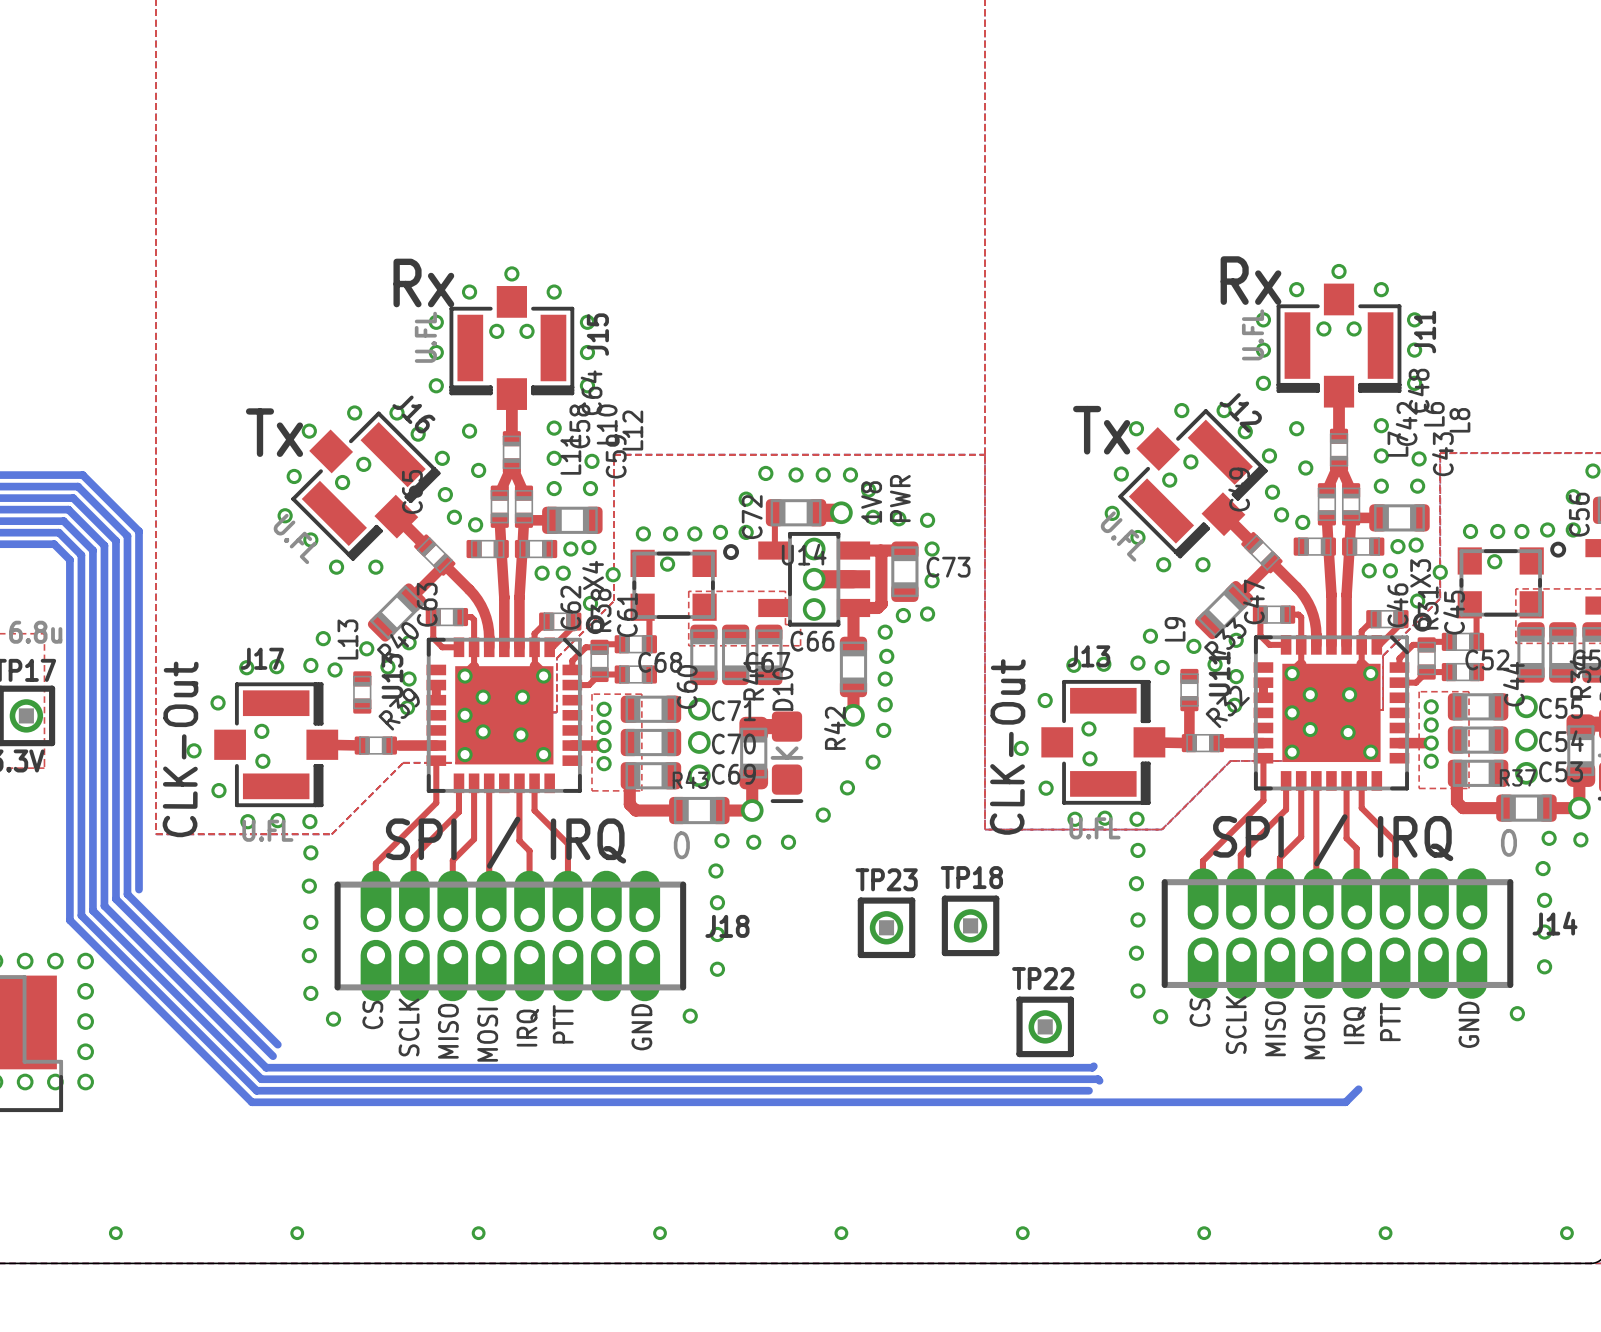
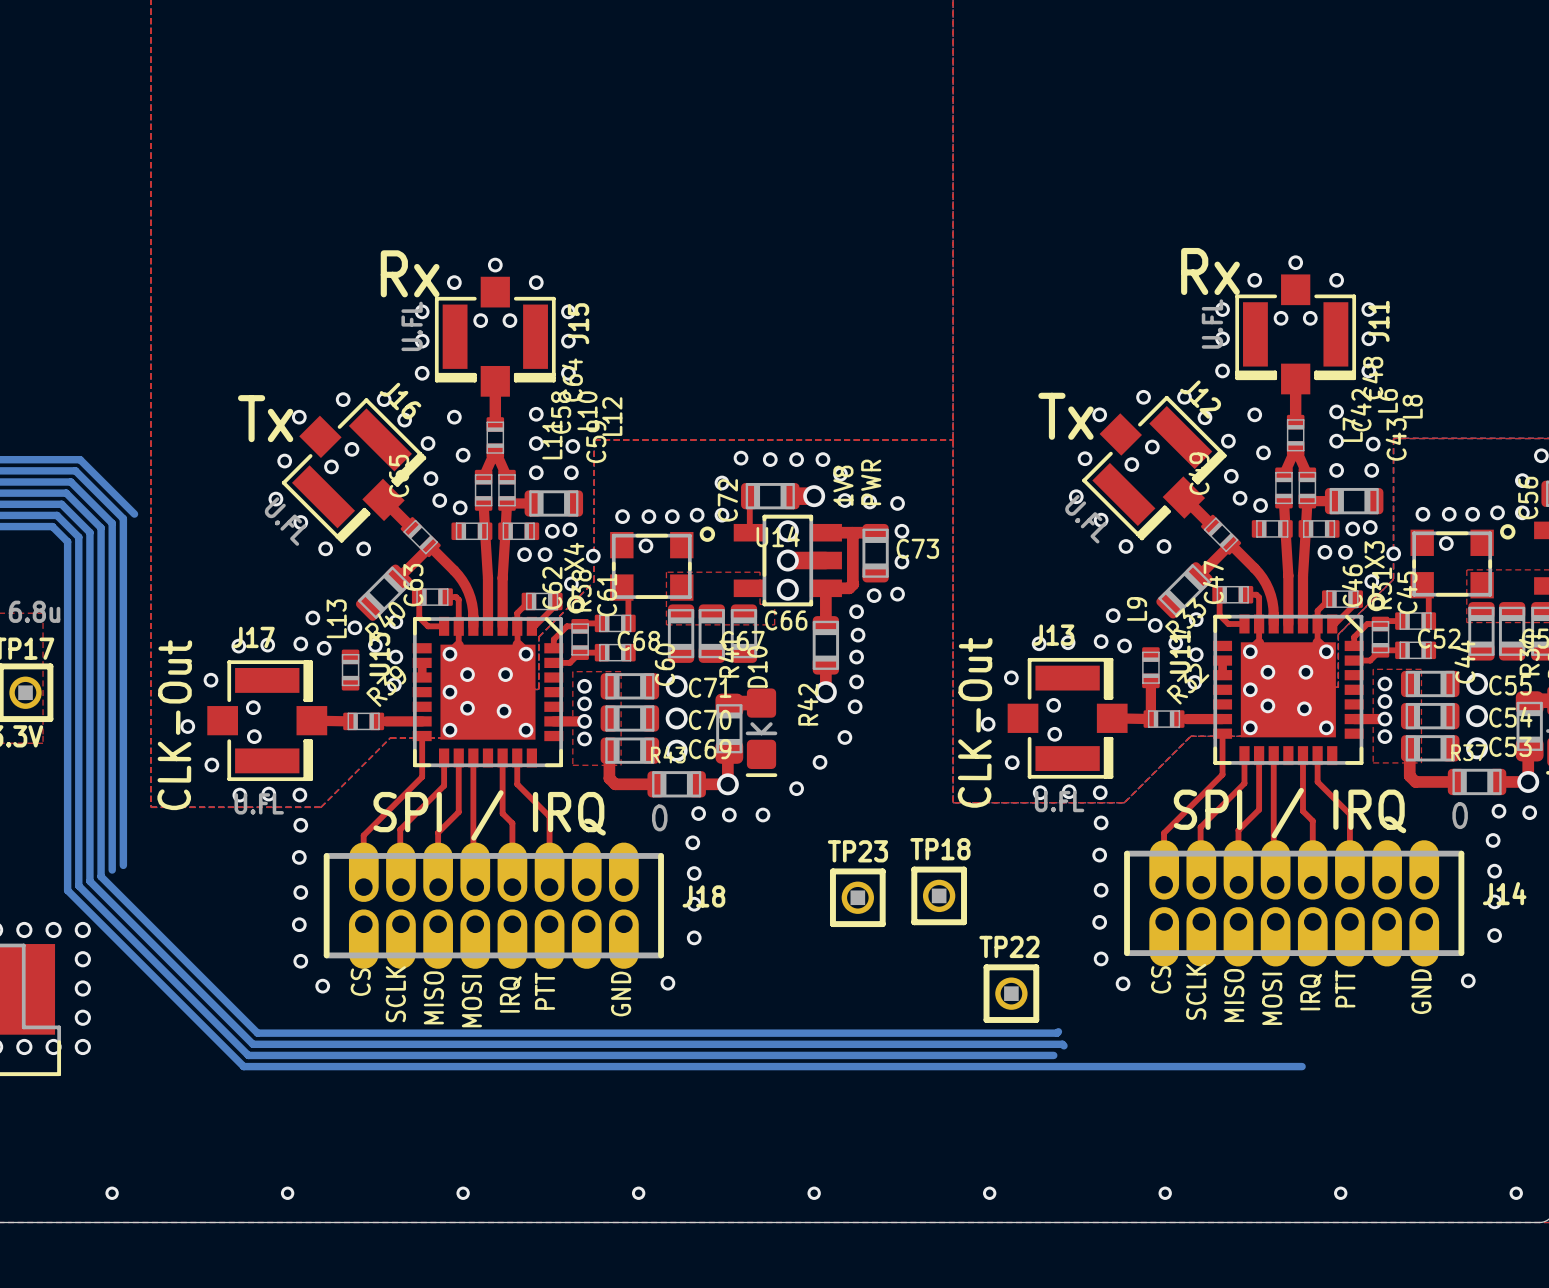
bottom track: (139, 531) (139, 889) -> none
bottom track: (127, 894) (277, 1044) -> none
bottom track: (115, 899) (273, 1056) -> none
bottom track: (1358, 1089) (1345, 1102) -> none

